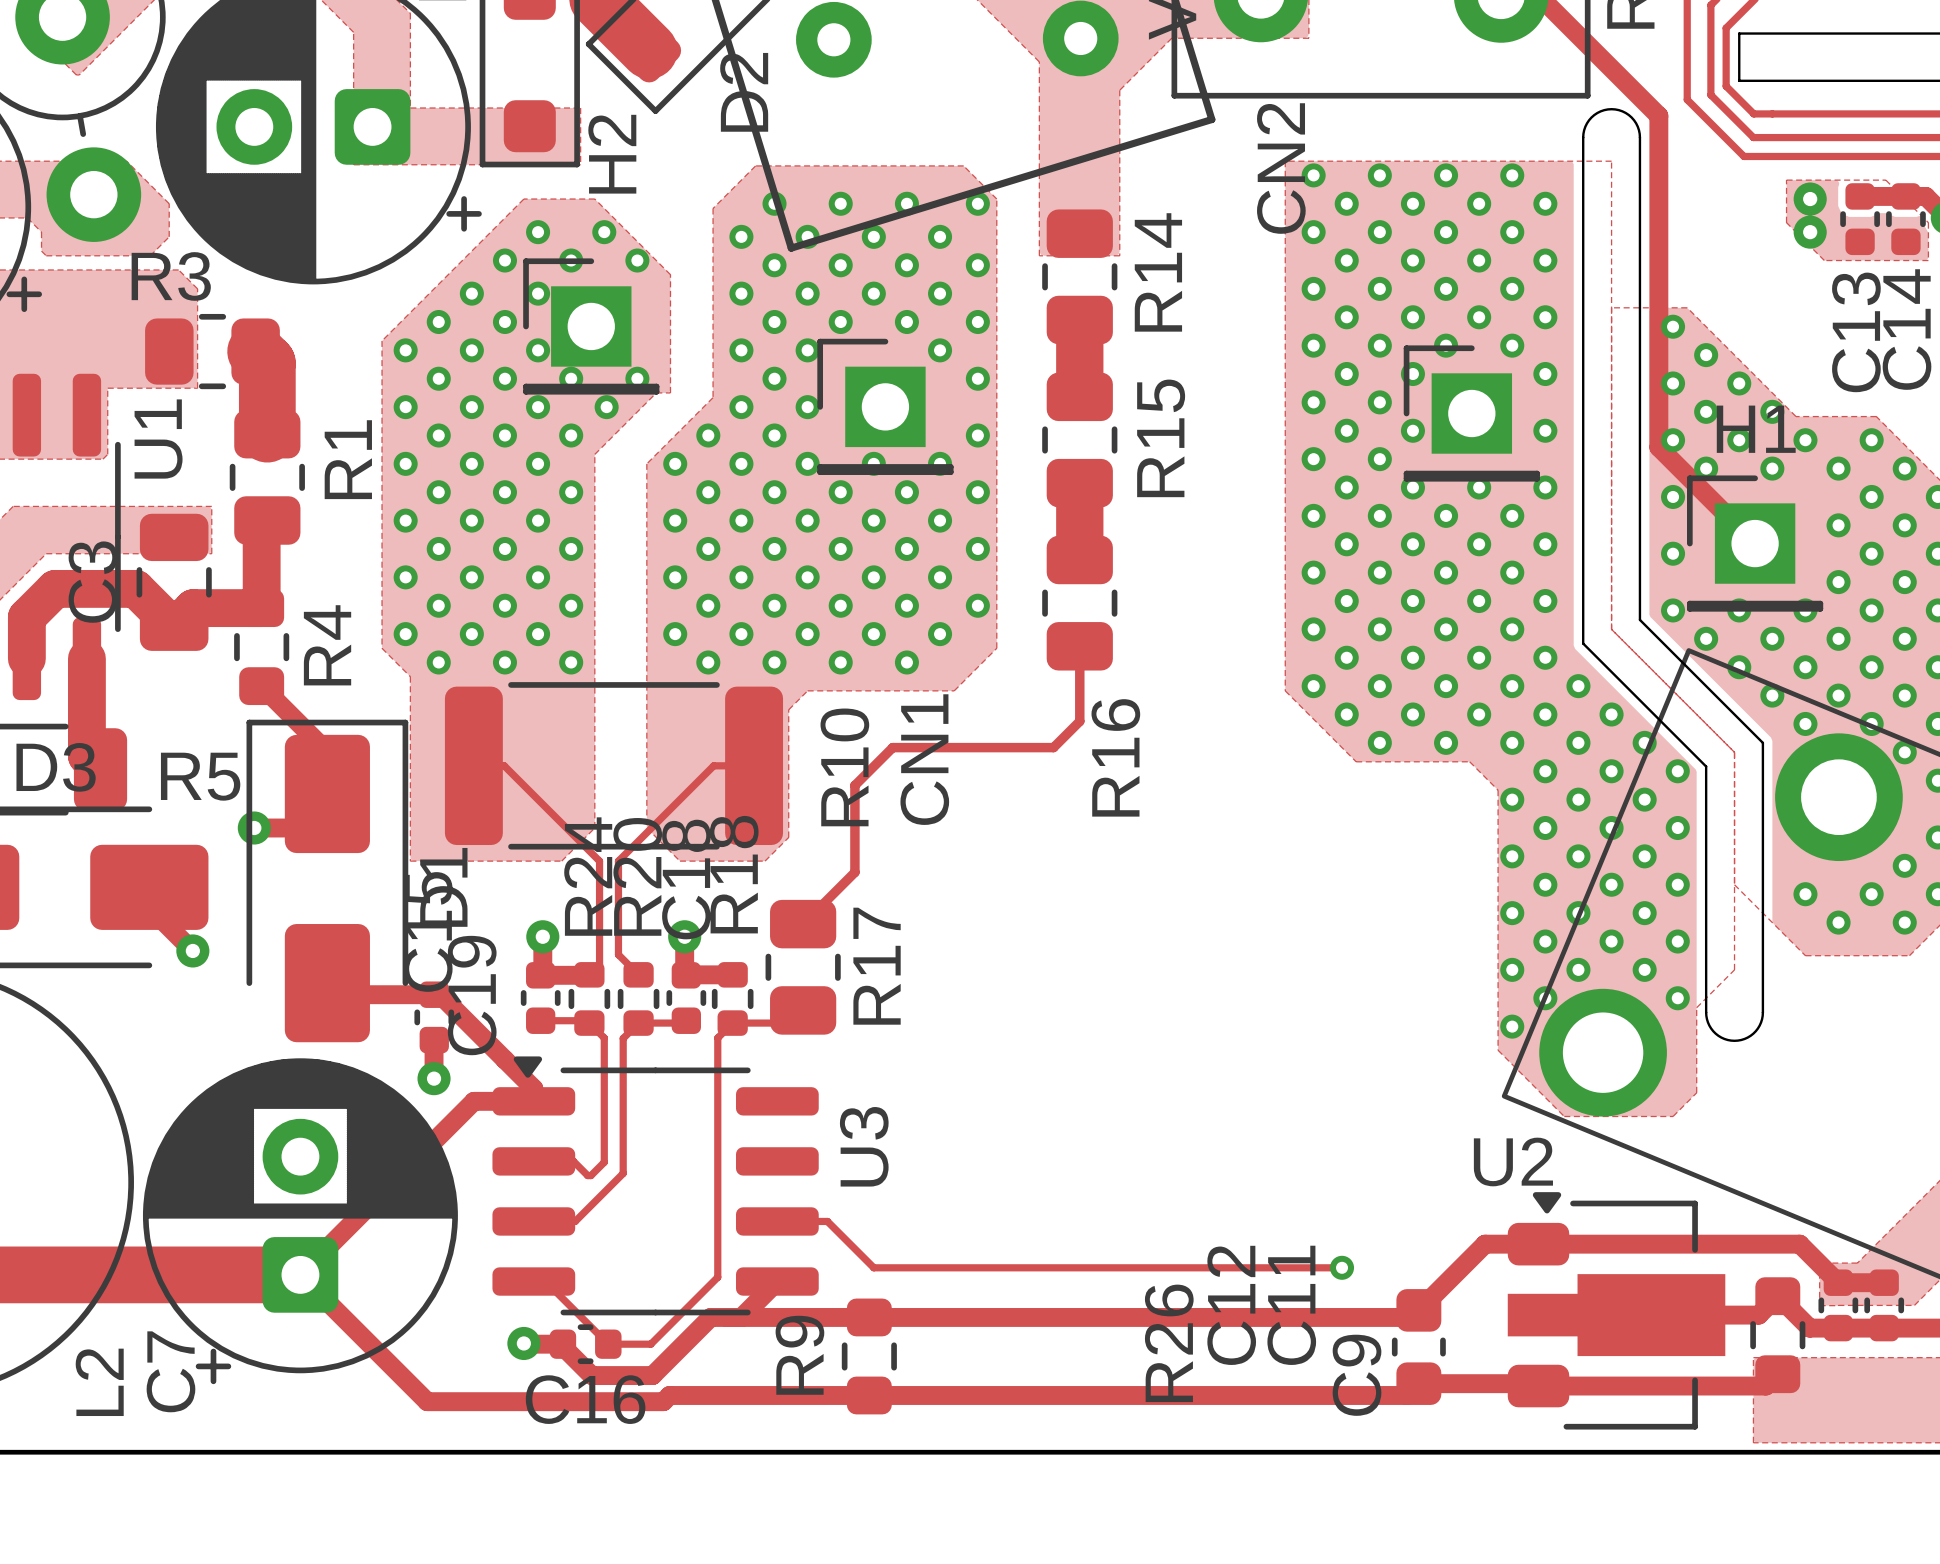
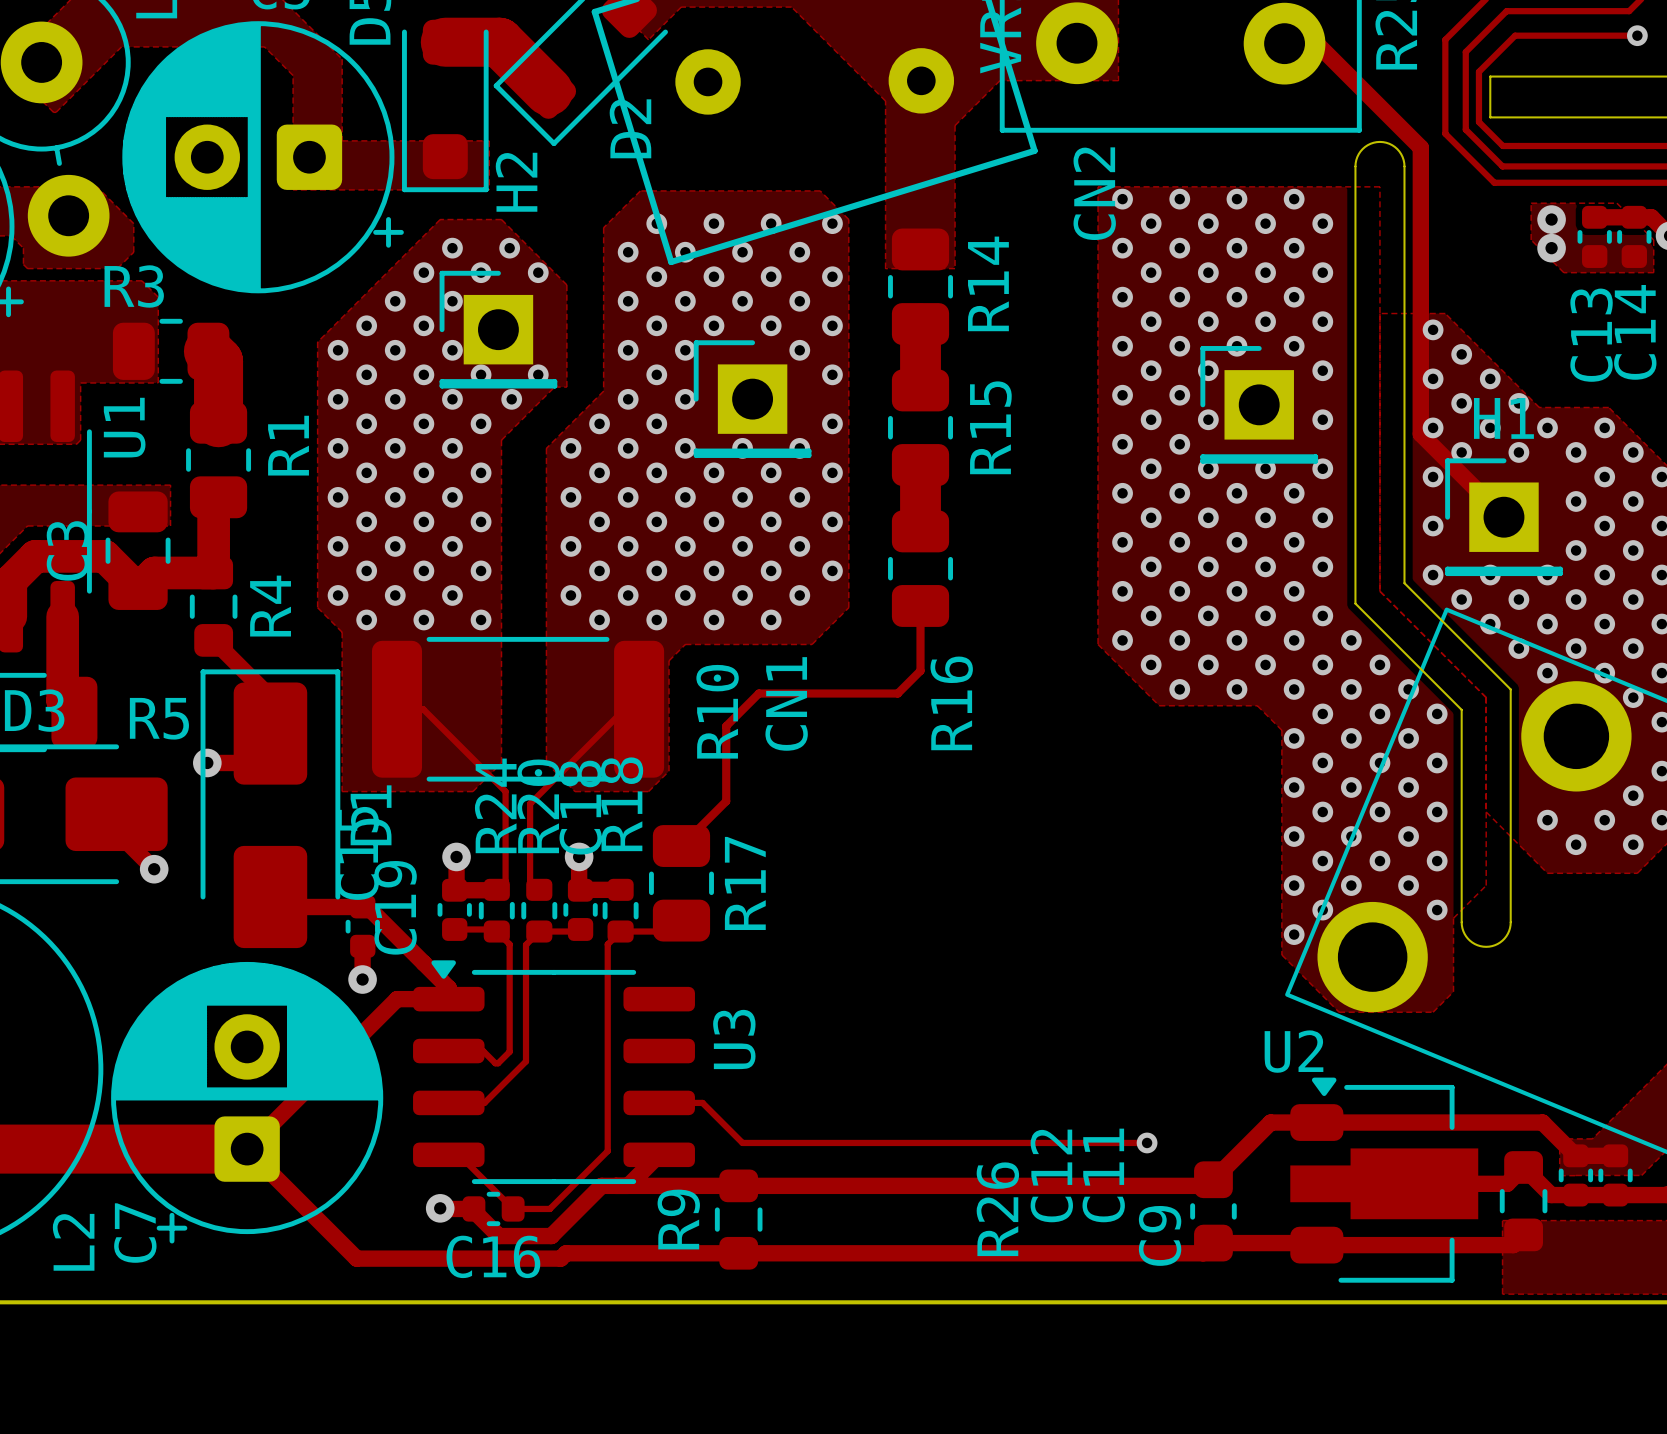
track: (737, 765) (713, 765) (618, 861) (618, 954) (627, 964) -> (624, 709) (530, 803) (530, 880)

